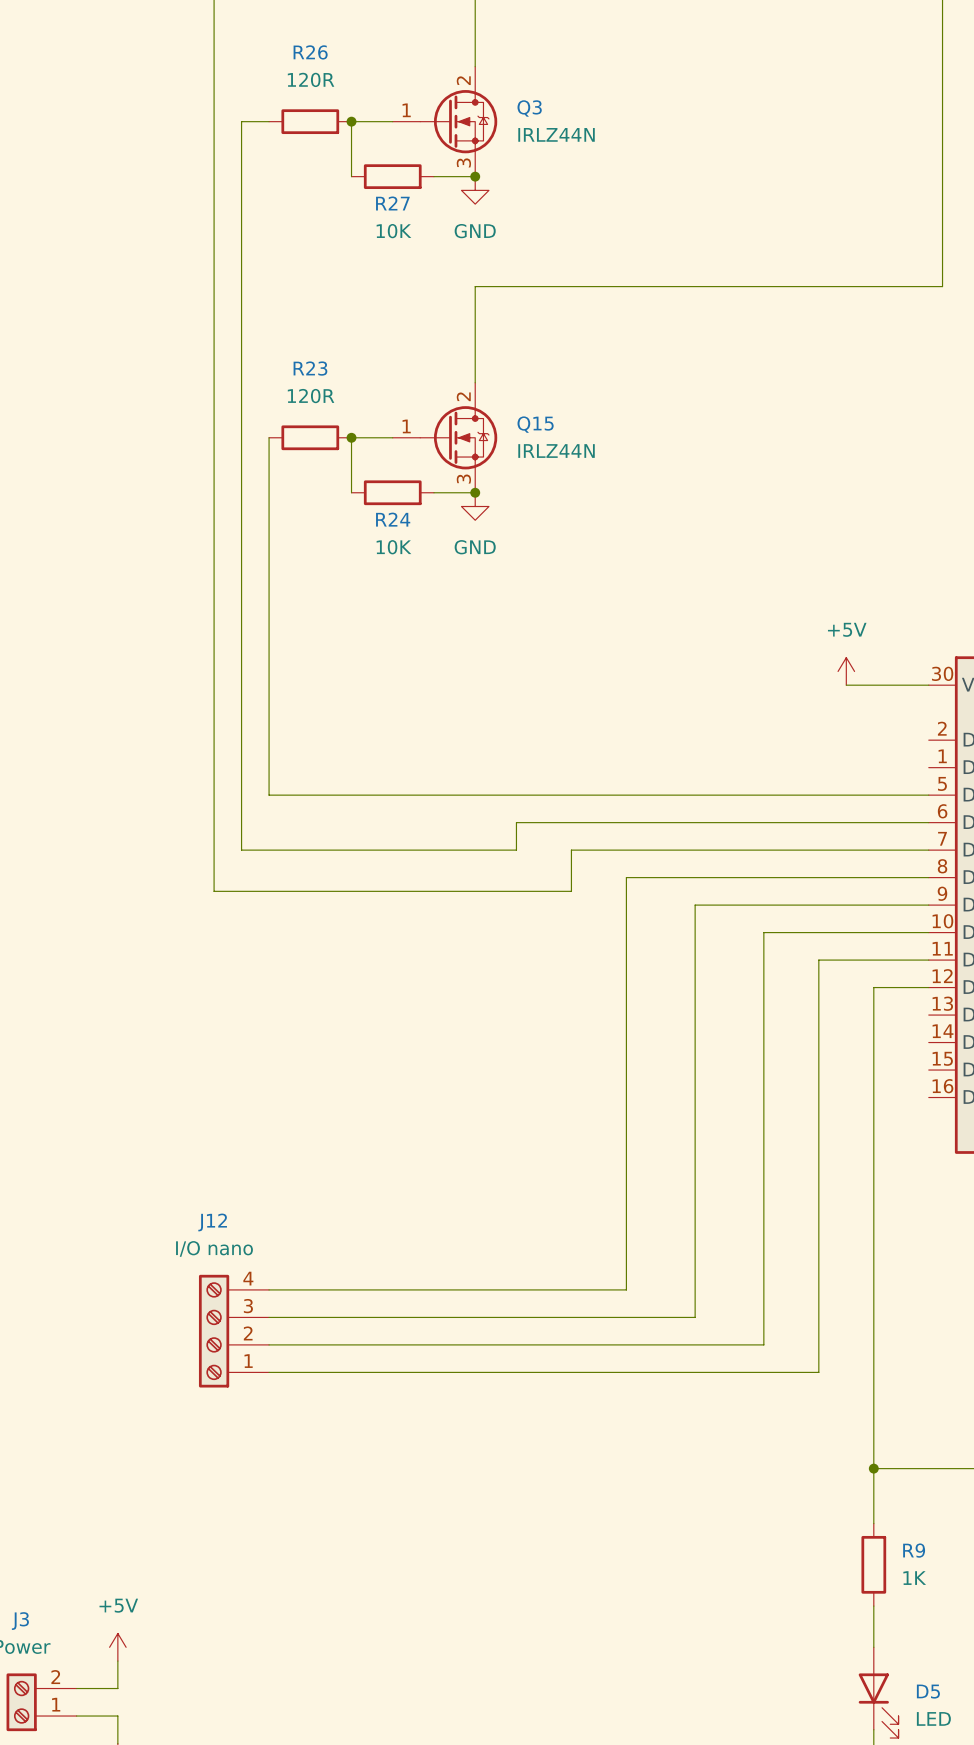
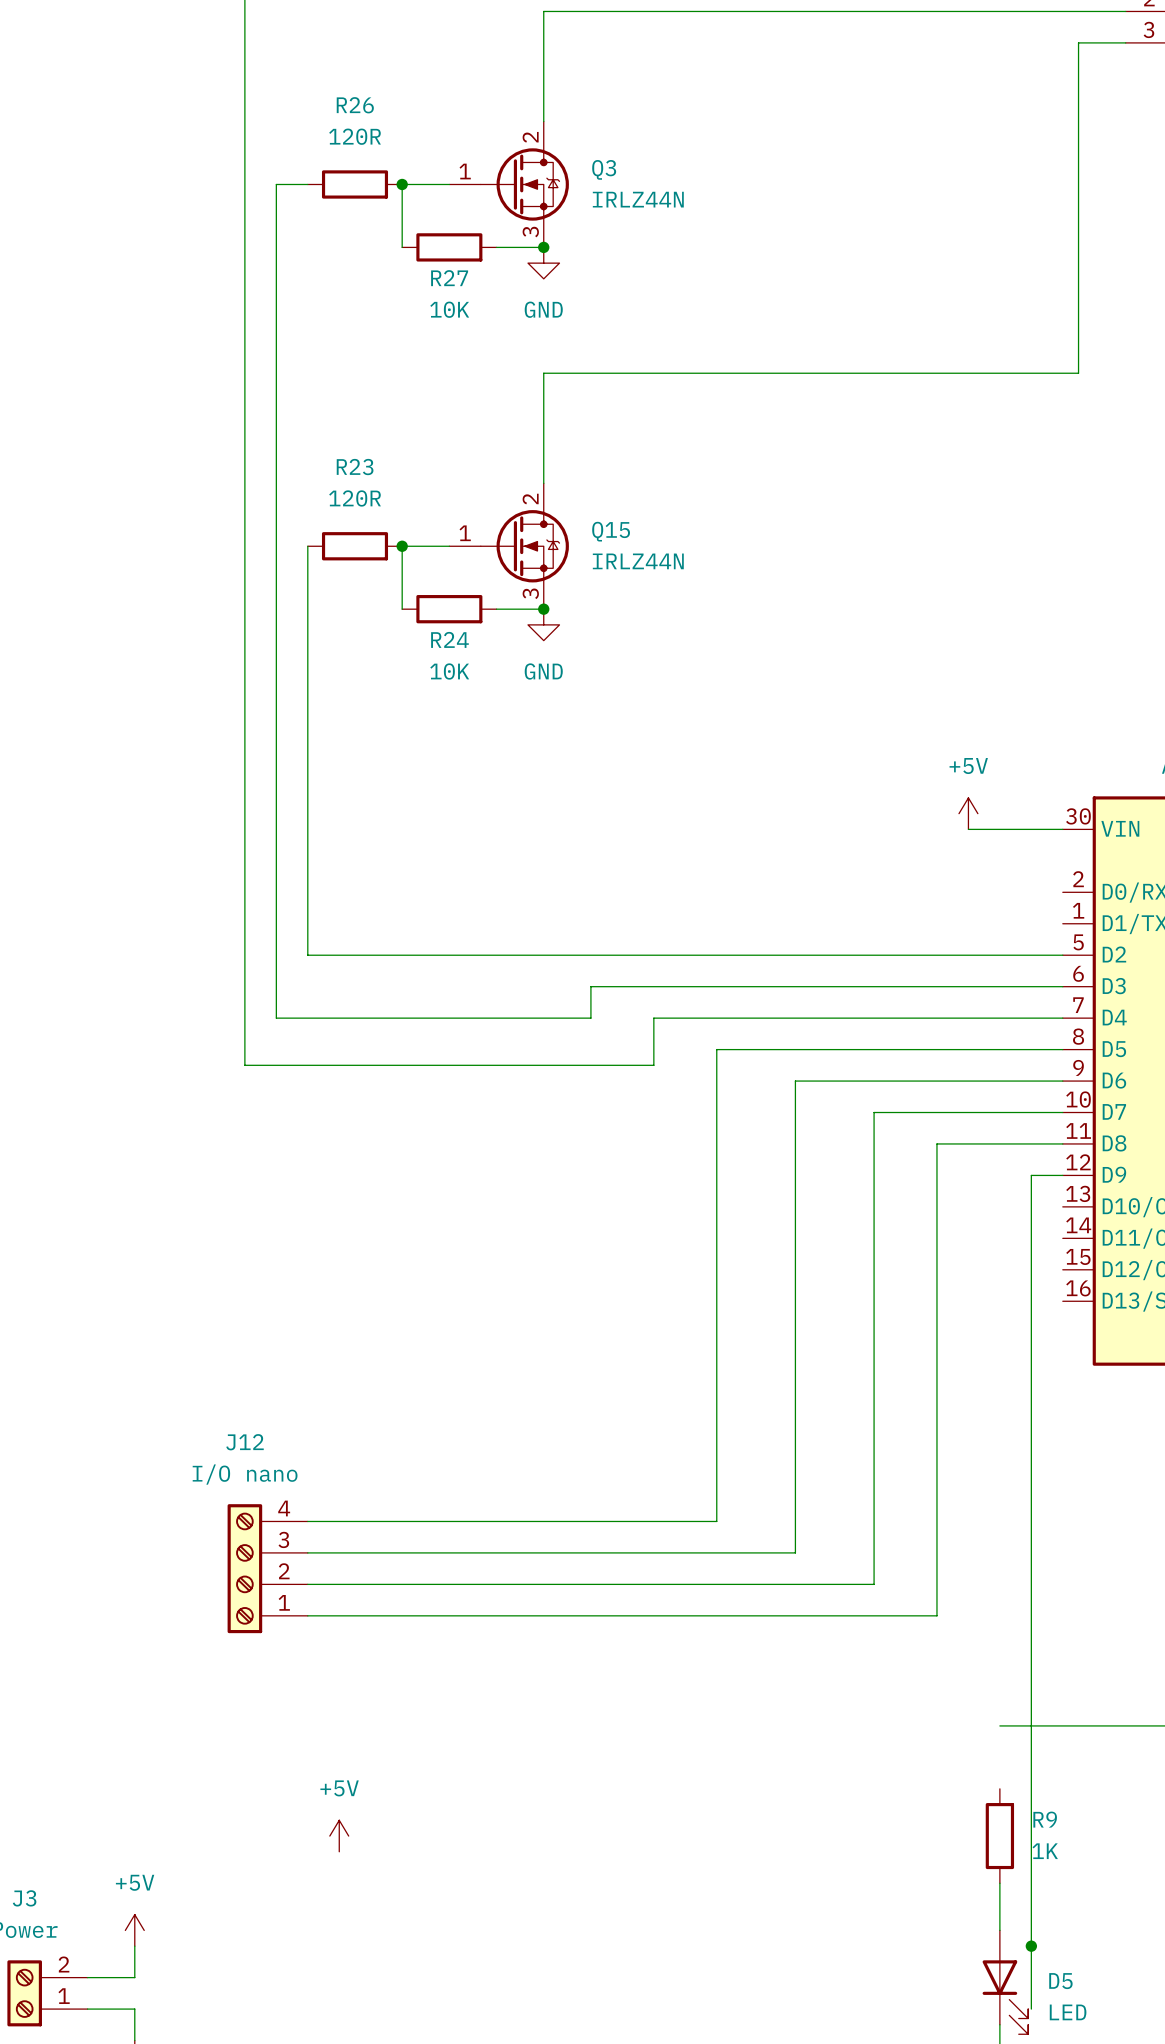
wire: (901, 987) (873, 987) (873, 1523) -> (1031, 1175) (1031, 2009)
junction: (873, 1468) -> none
power symbol: none -> +5V (339, 1836)
junction: none -> (1031, 1946)

